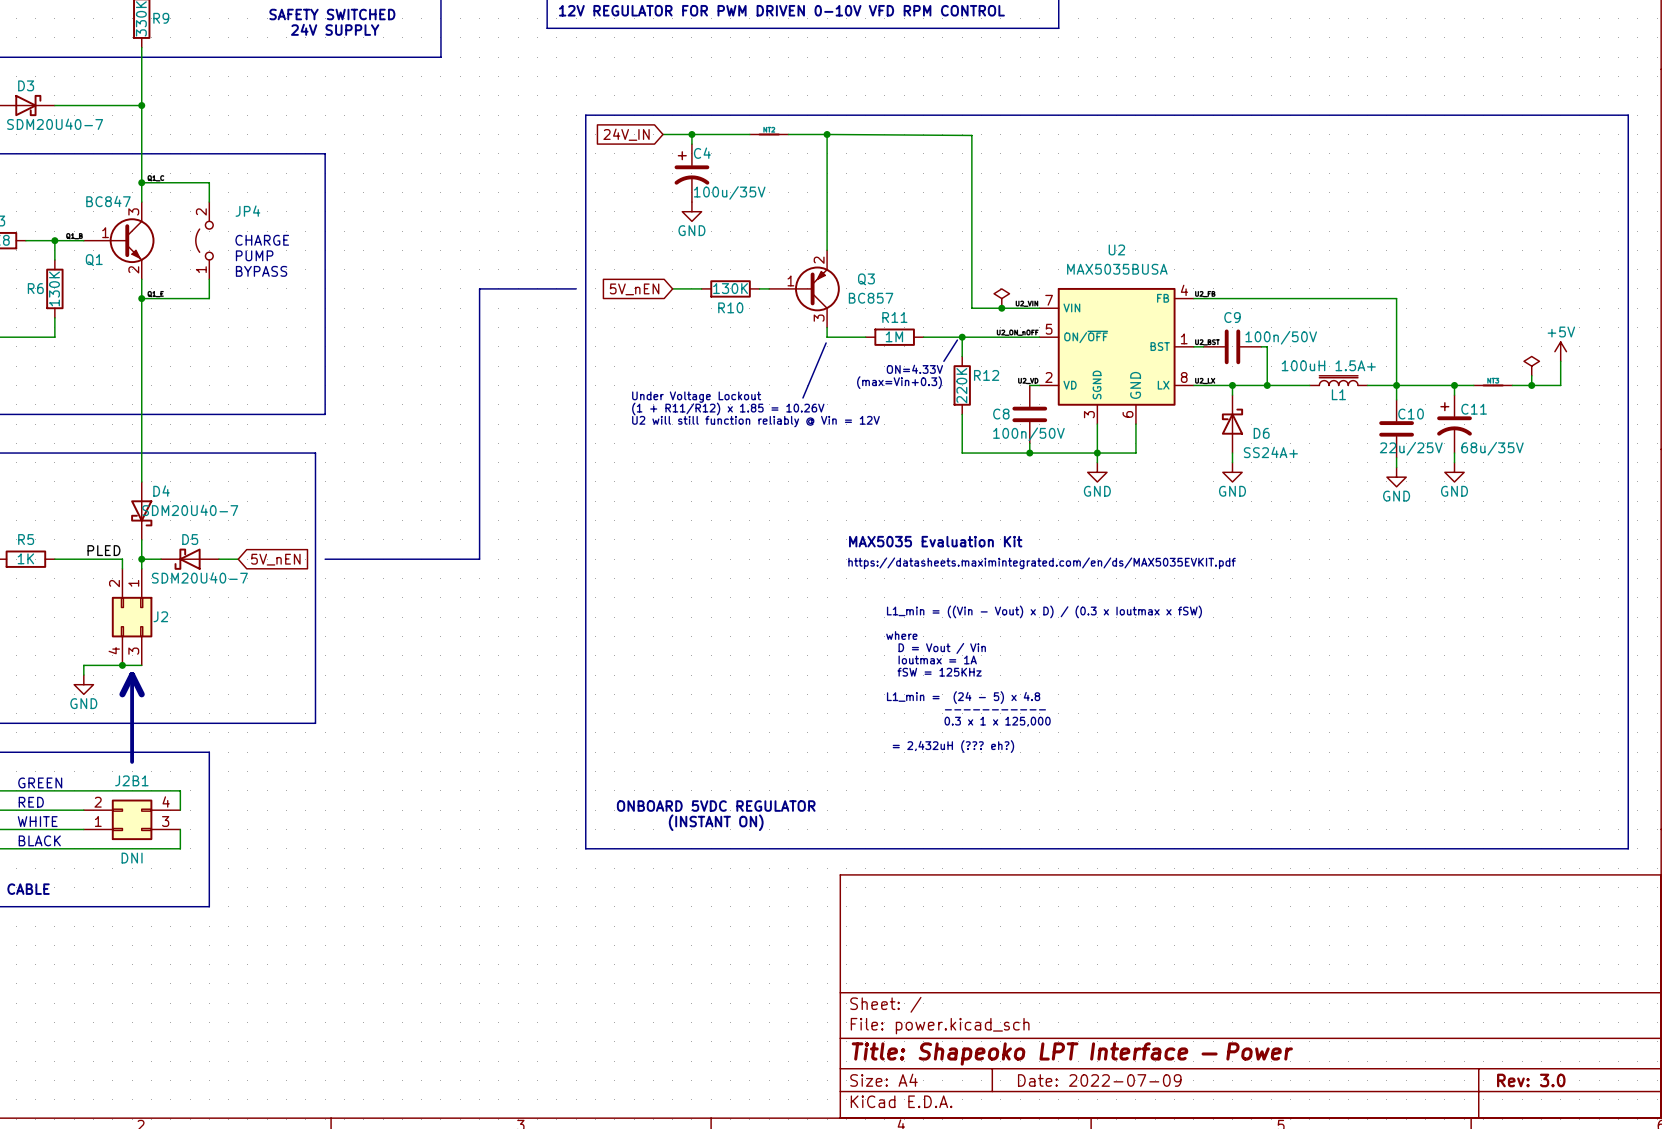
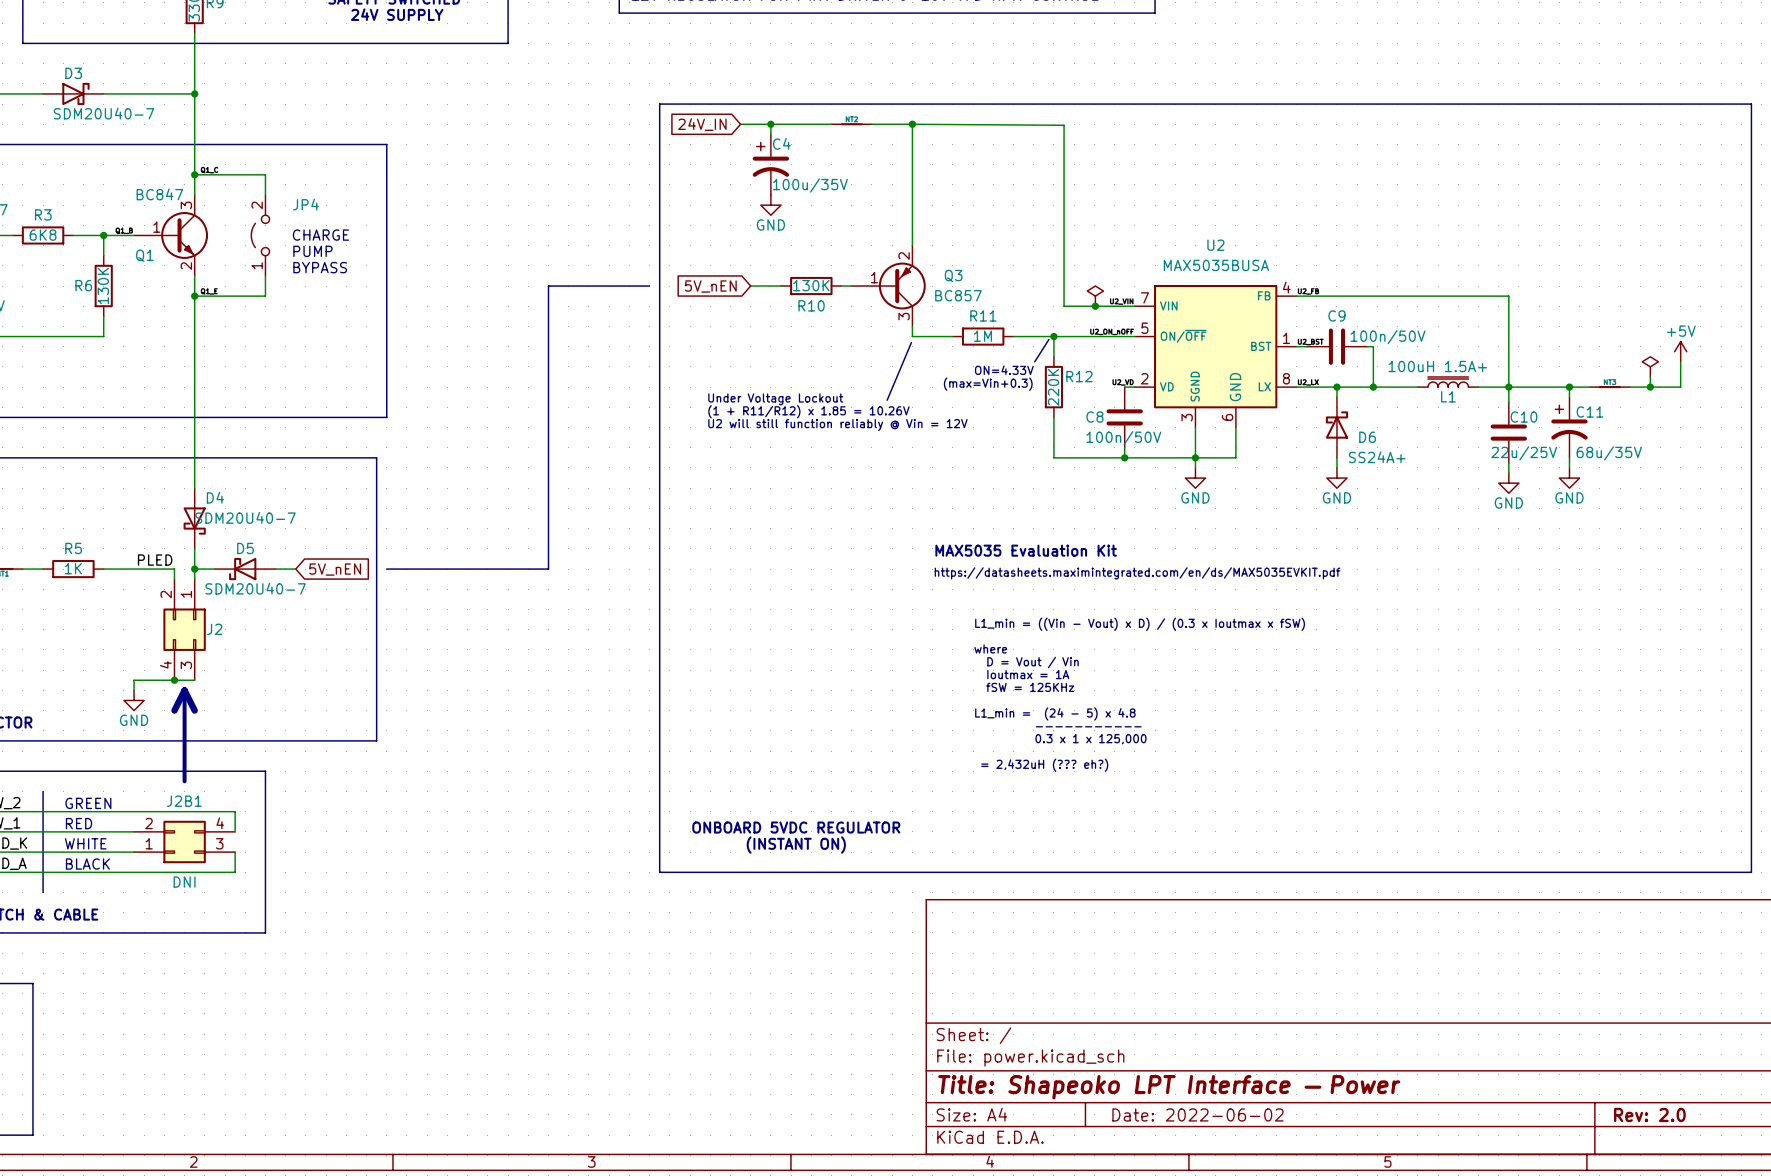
title block: Date: 2022-07-09 (1099, 1080) -> Date: 2022-06-02 (1197, 1114)
title block: Rev: 3.0 (1531, 1080) -> Rev: 2.0 (1649, 1114)

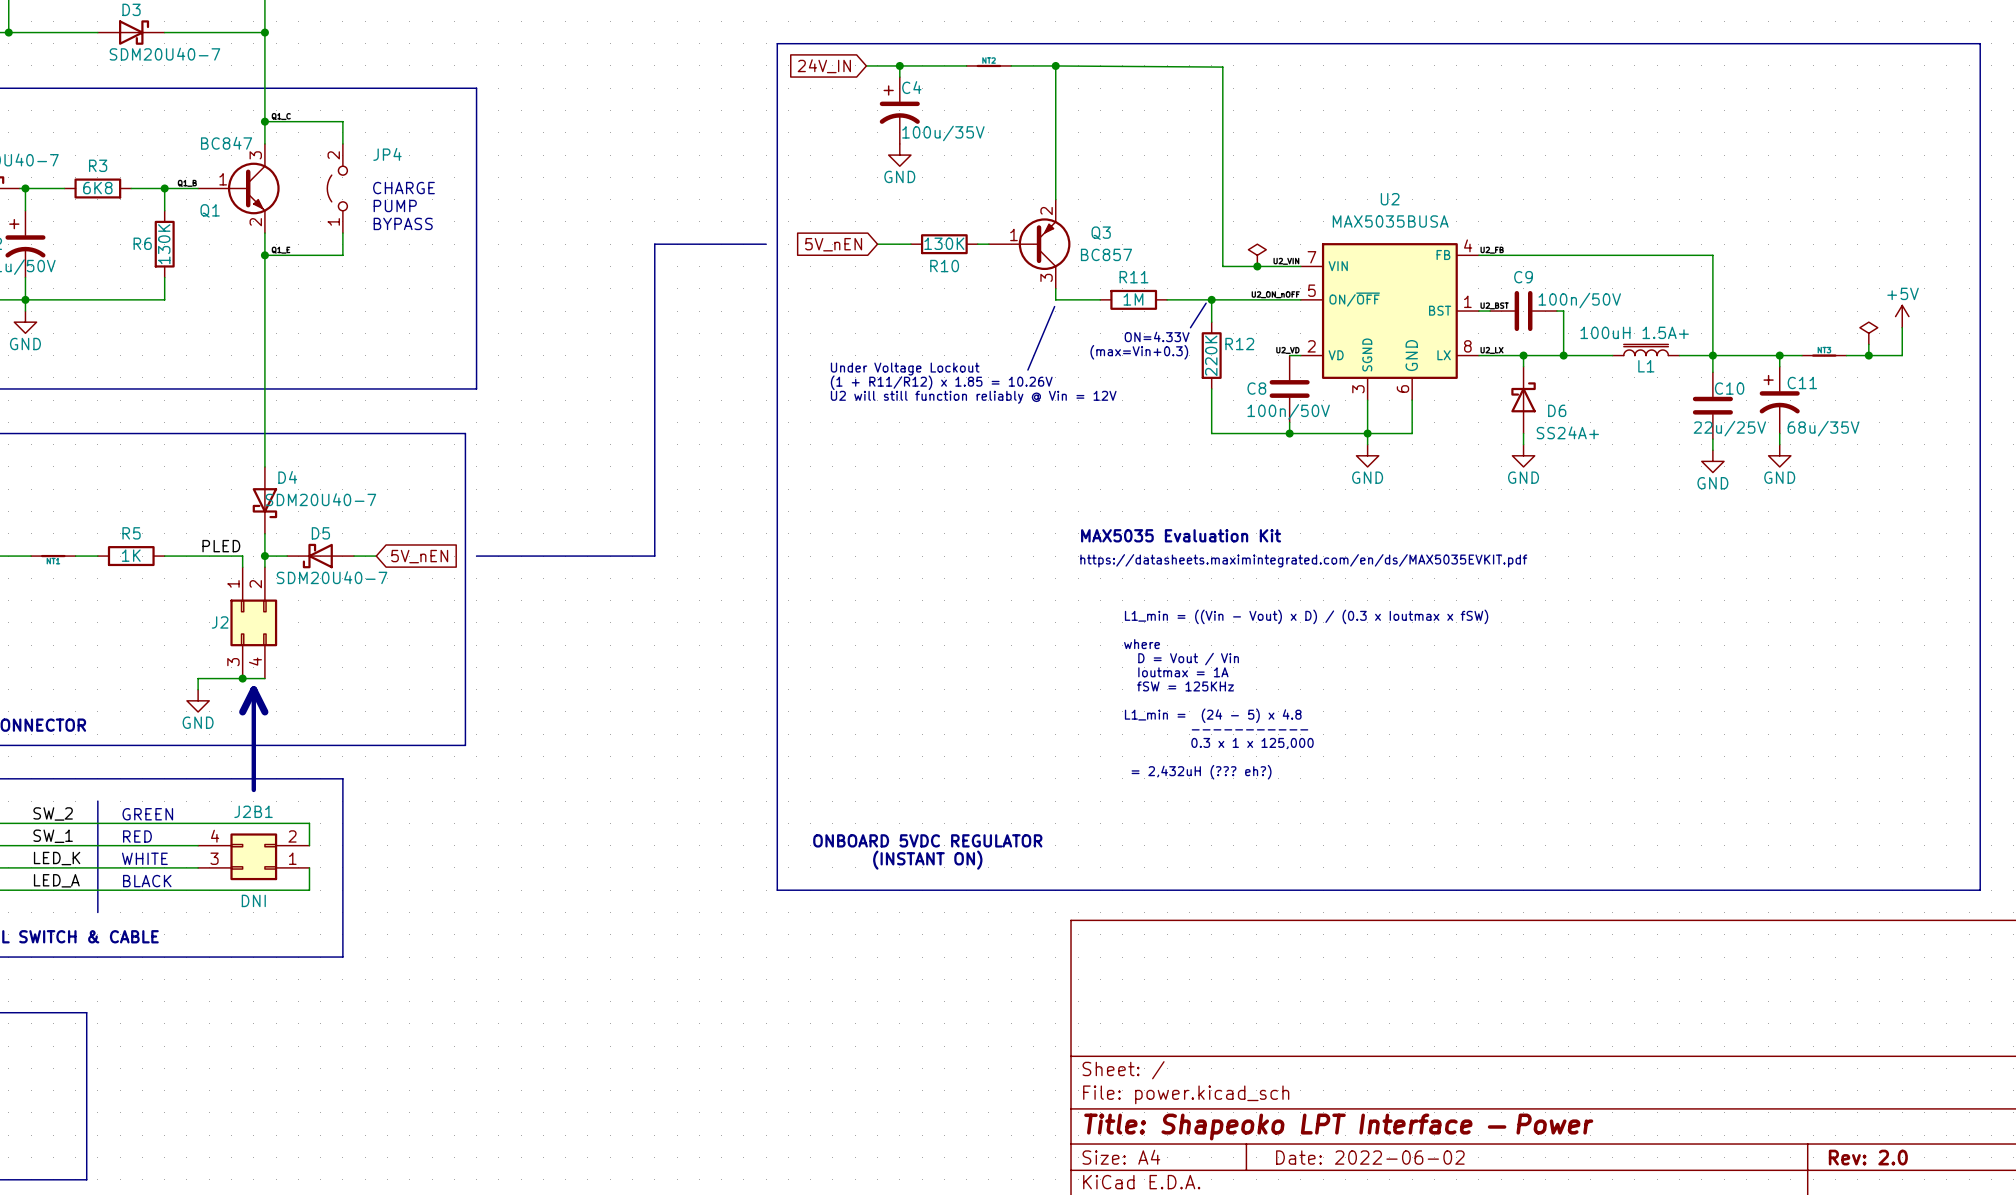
J2 flip: as is (184, 629) -> left-right (253, 622)
J2B1 flip: as is (184, 841) -> left-right (253, 856)

